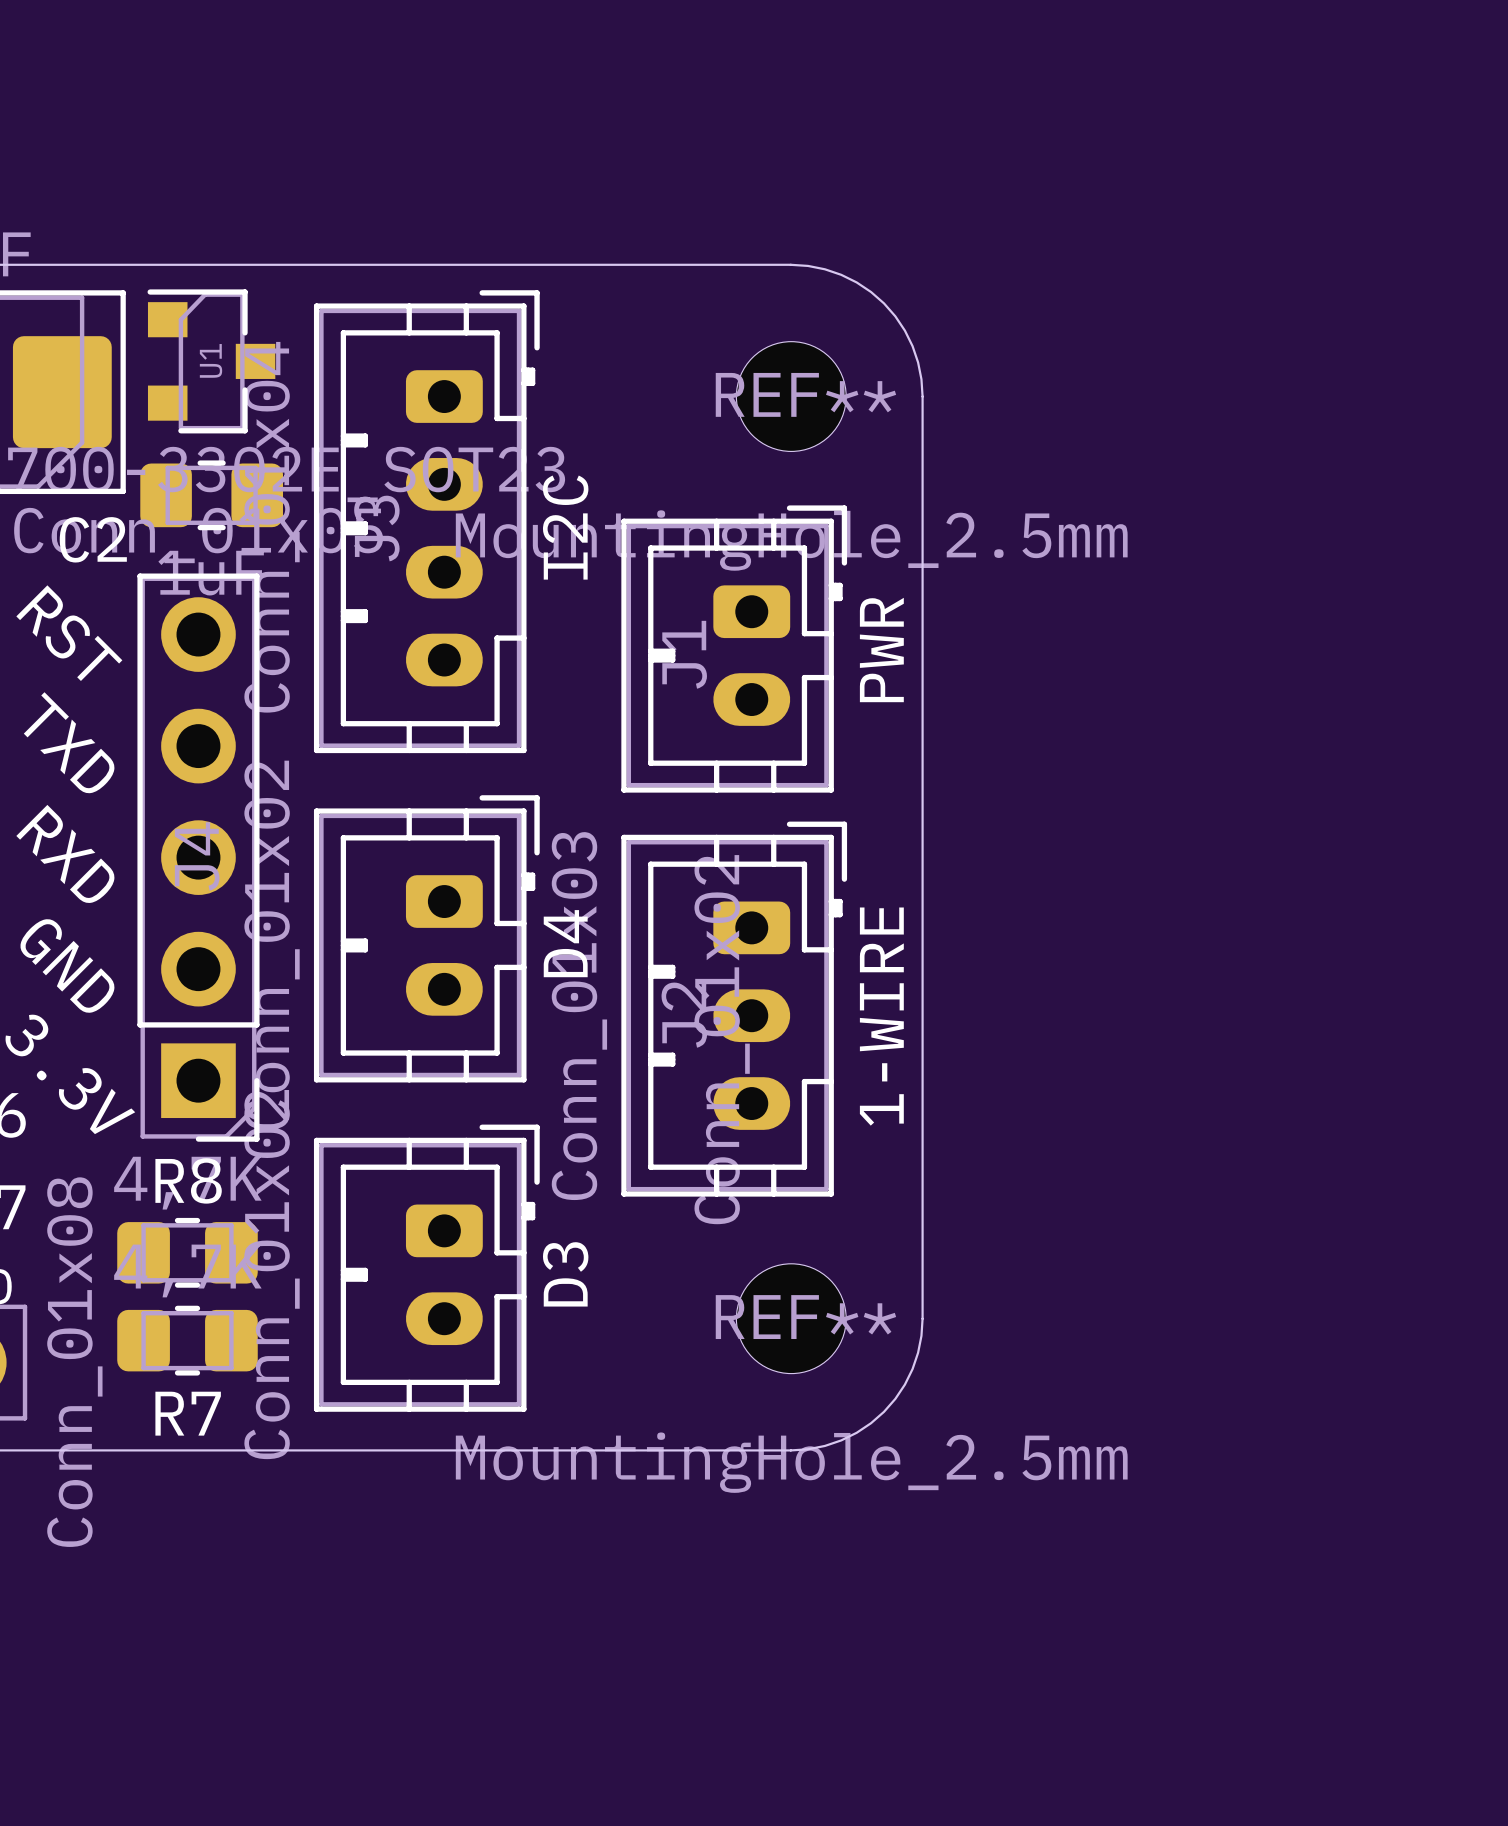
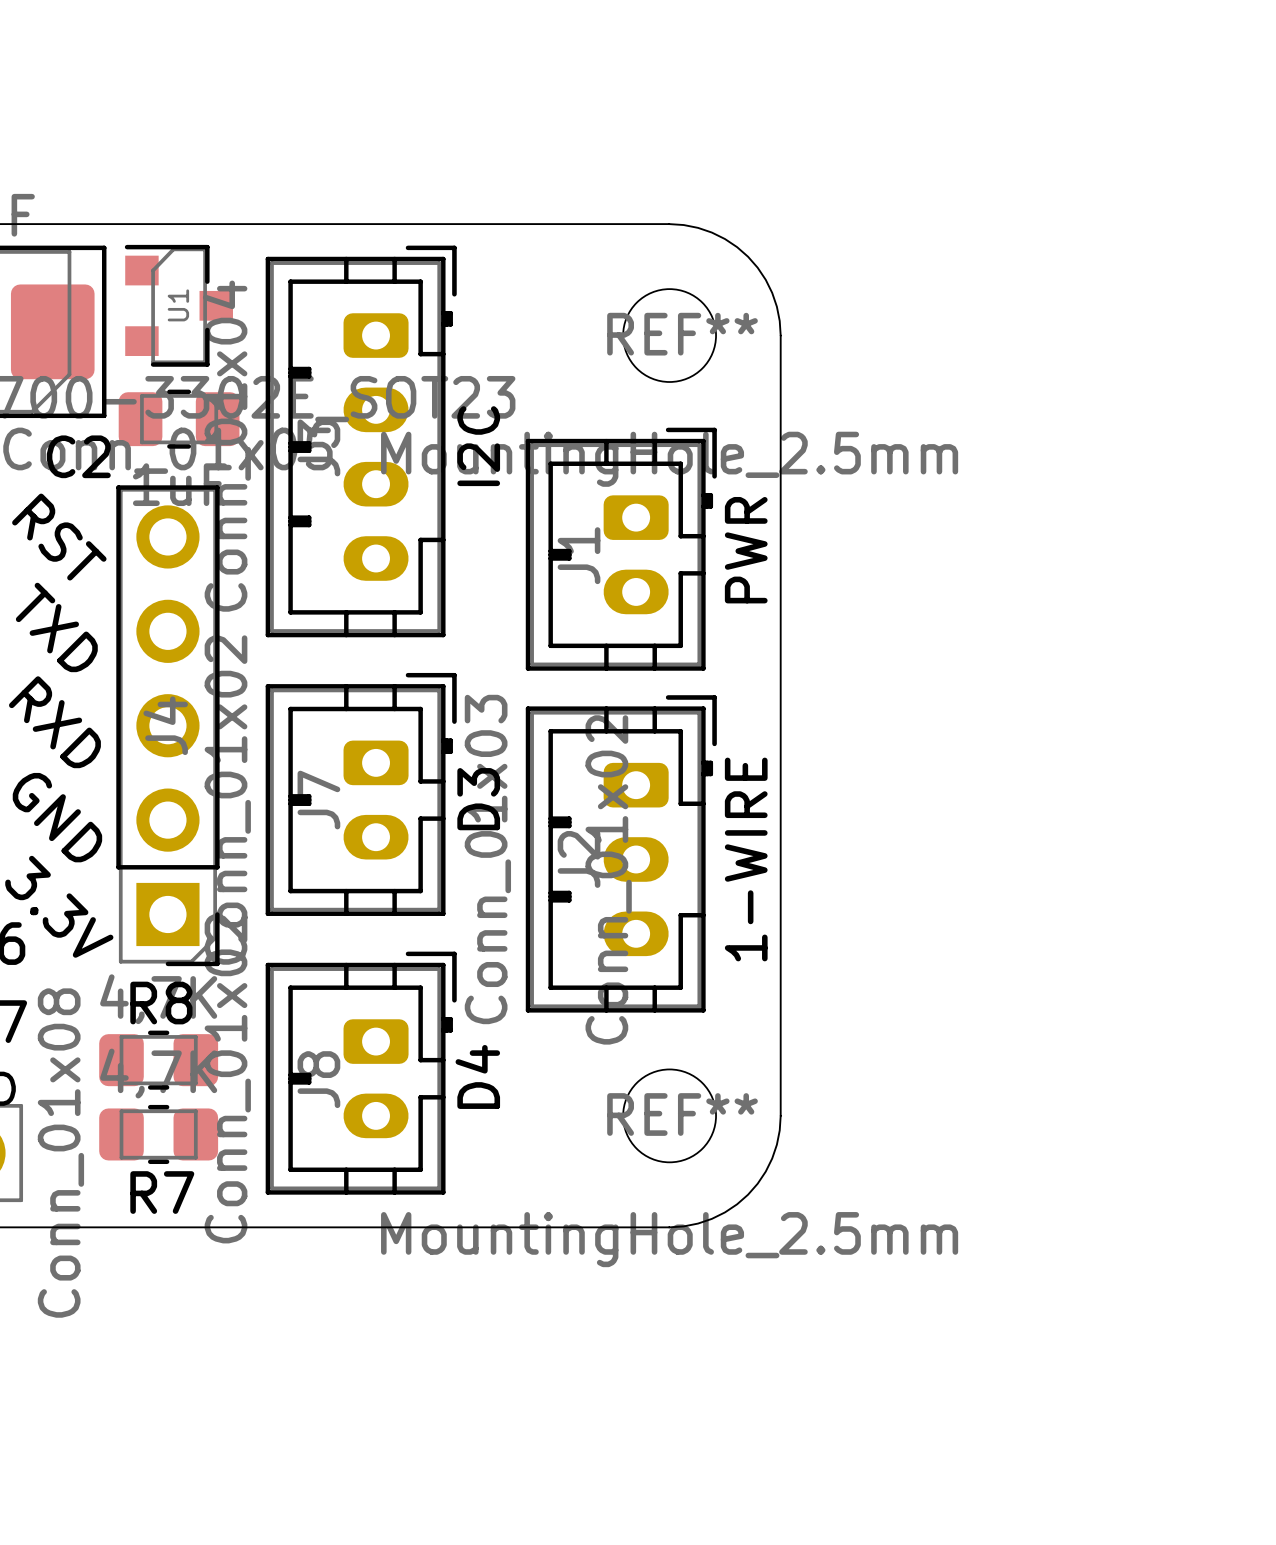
text: D4 (565, 943) -> D3 (478, 799)
J7 name: none -> J7 (318, 800)
R8 name: R8 (188, 1180) -> R7 (162, 1192)
J8 name: none -> J8 (318, 1079)
text: D3 (565, 1274) -> D4 (477, 1076)
R7 name: R7 (188, 1413) -> R8 (161, 1003)

